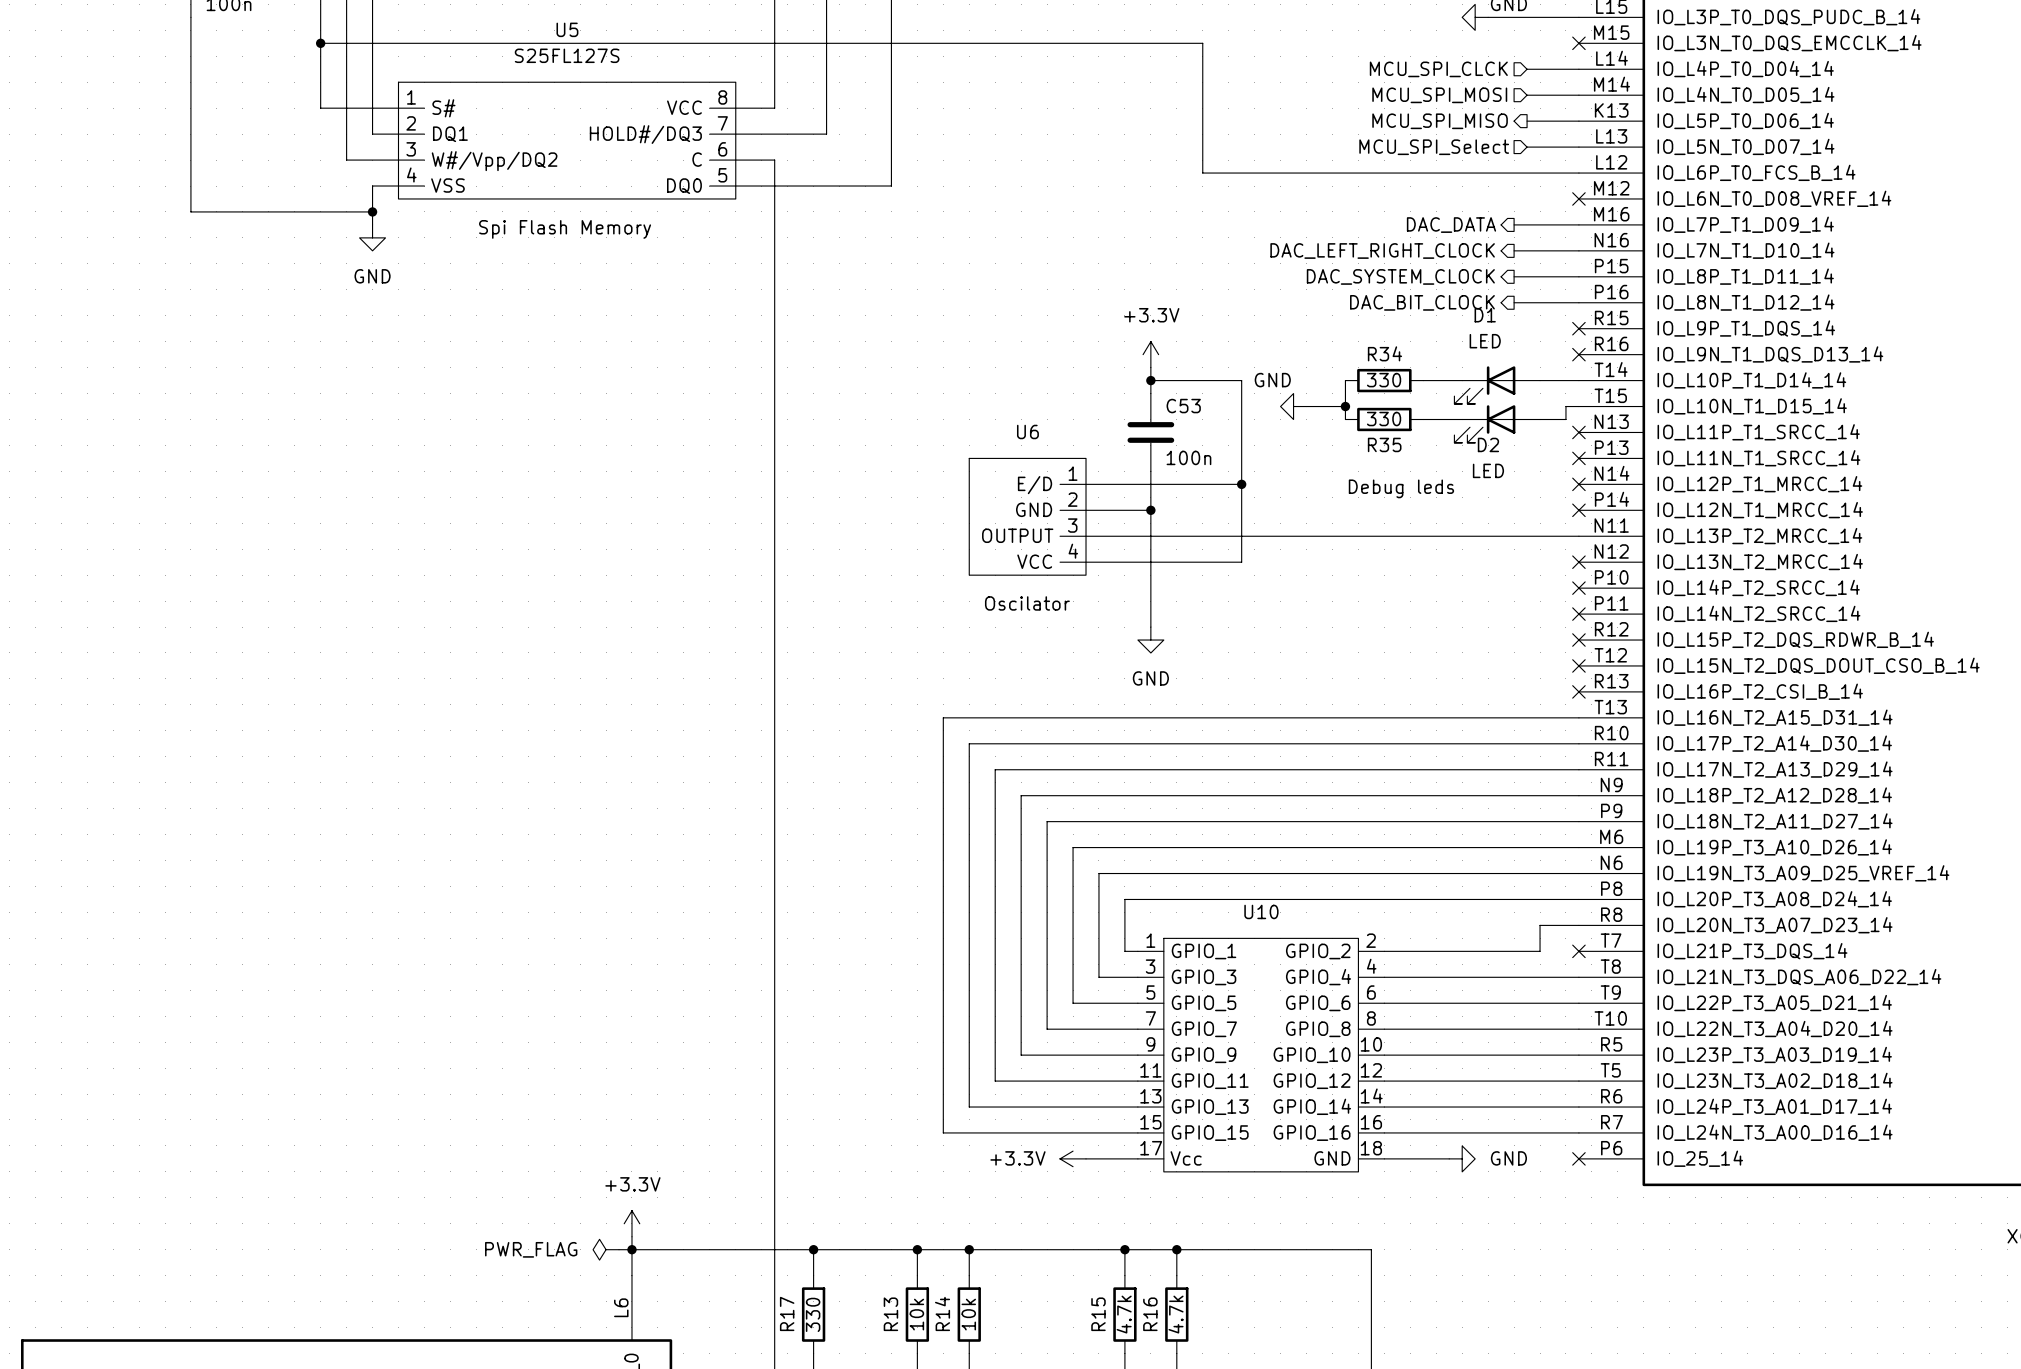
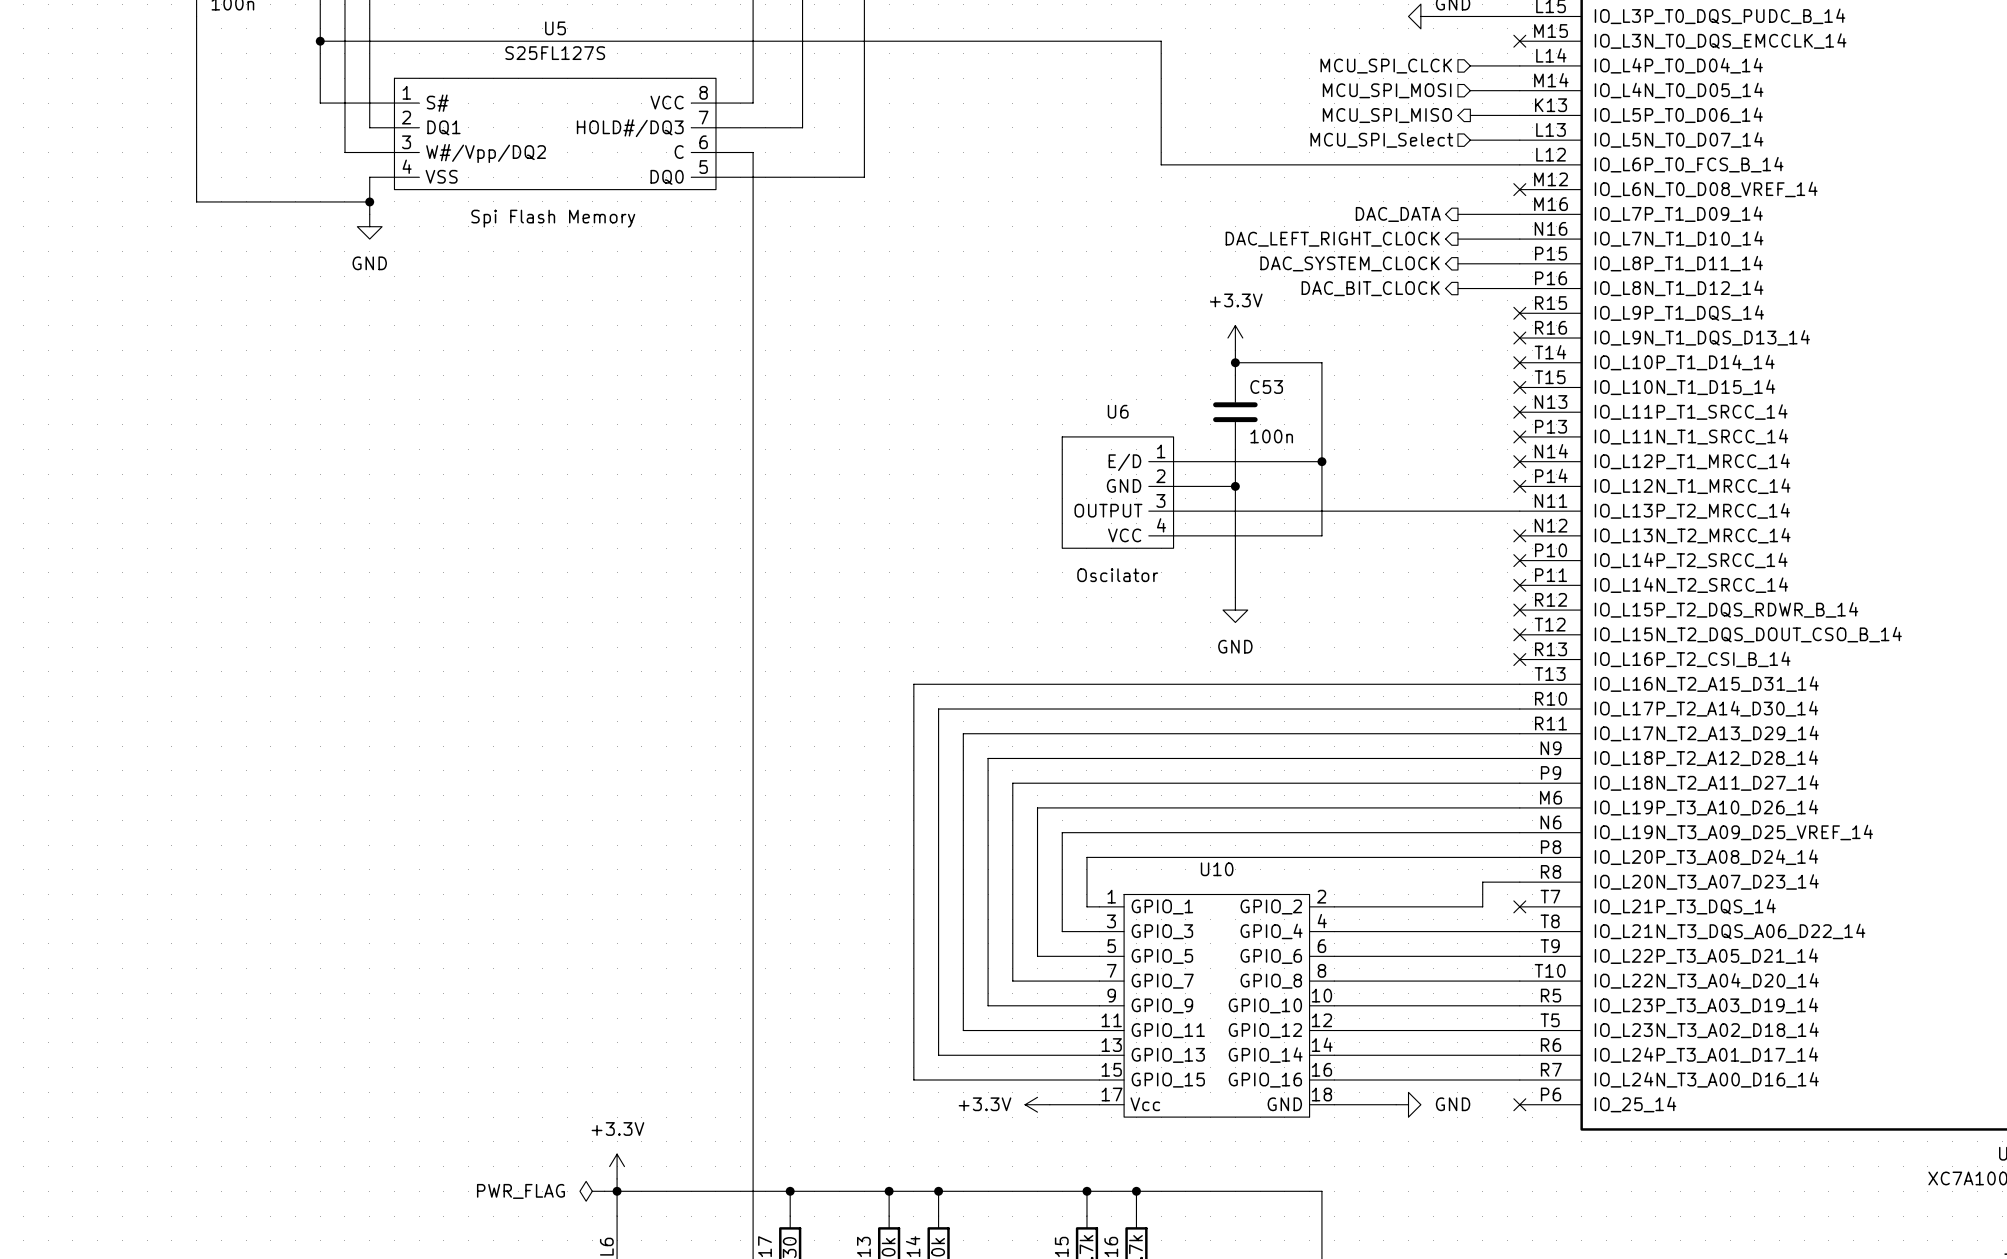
power symbol position: +3.3V (1150, 354) -> +3.3V (1235, 338)
wire: (1150, 367) (1150, 393) -> (1235, 350) (1235, 375)
wire: (1150, 380) (1241, 380) (1241, 562) -> (1235, 362) (1321, 362) (1321, 535) (1198, 535)
junction: (1150, 380) -> none
junction: none -> (1235, 362)
wire: (1345, 380) (1345, 419) -> none
R34: 330 (1384, 380) -> none
wire: (1423, 380) (1462, 380) -> none
wire: (1540, 380) (1578, 380) -> none
no-connect mark: none -> (1519, 362)
D1: LED (1497, 385) -> none
power symbol: GND (1293, 406) -> none
wire: (1306, 406) (1345, 406) -> none
junction: (1345, 406) -> none
wire: (1578, 406) (1565, 406) (1565, 419) (1540, 419) -> none
no-connect mark: none -> (1519, 387)
R35: 330 (1384, 419) -> none
wire: (1423, 419) (1462, 419) -> none
D2: LED (1497, 424) -> none
C53 position: (1150, 432) -> (1235, 412)
wire: (1150, 471) (1150, 627) -> (1235, 449) (1235, 597)
wire: (1086, 484) (1215, 484) -> (1198, 461) (1321, 461)
junction position: (1241, 484) -> (1235, 486)
junction: none -> (1321, 461)
text: Debug leds (1401, 488) -> none
wire: (1086, 510) (1150, 510) -> (1173, 486) (1235, 486)
junction: (1150, 510) -> none
U6 position: (1027, 516) -> (1117, 492)
wire: (1086, 536) (1215, 536) -> none
wire: (1086, 562) (1215, 562) -> none
text position: Oscilator (1027, 603) -> Oscilator (1117, 575)
power symbol: GND (1150, 640) -> none
power symbol: none -> GND (1235, 610)

